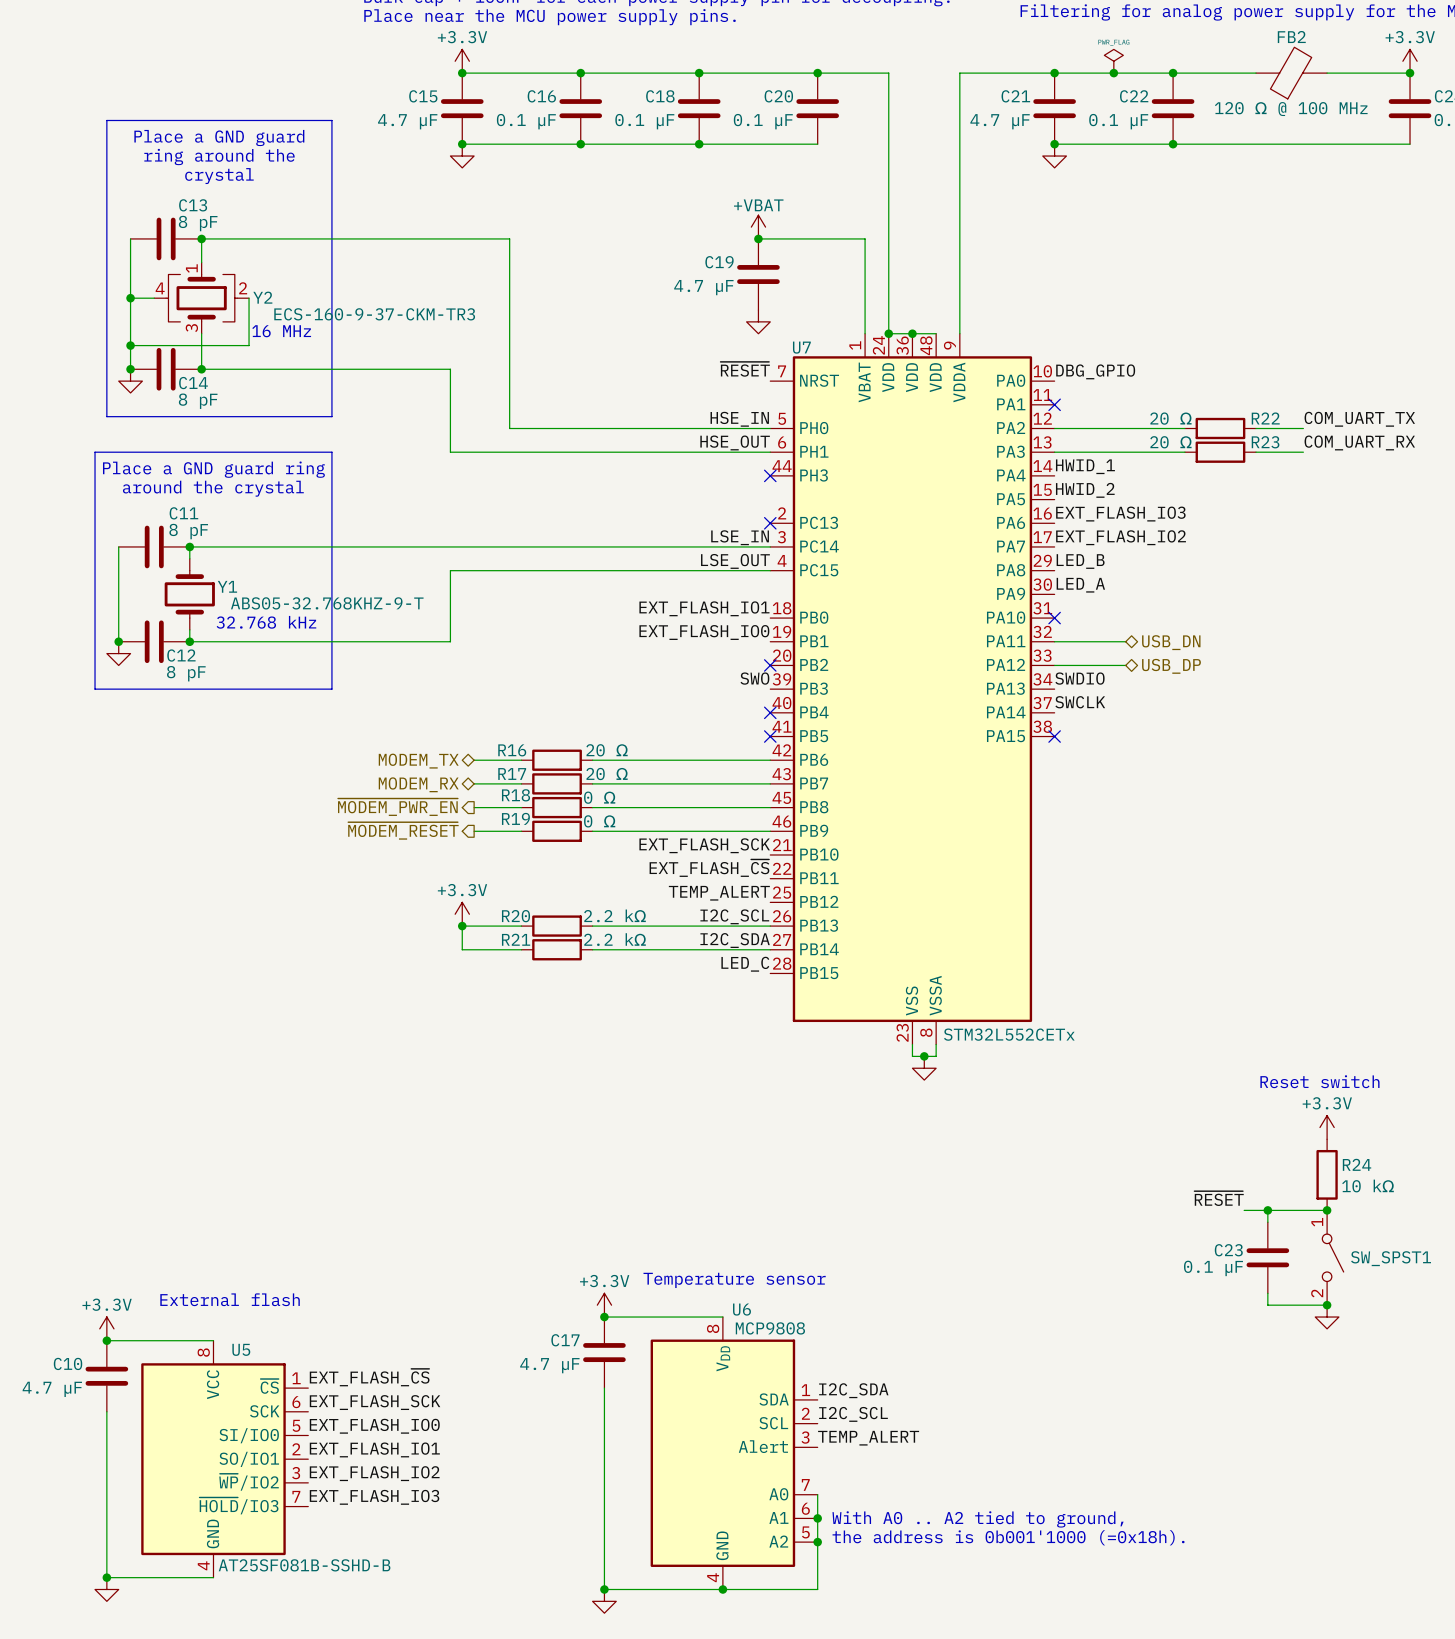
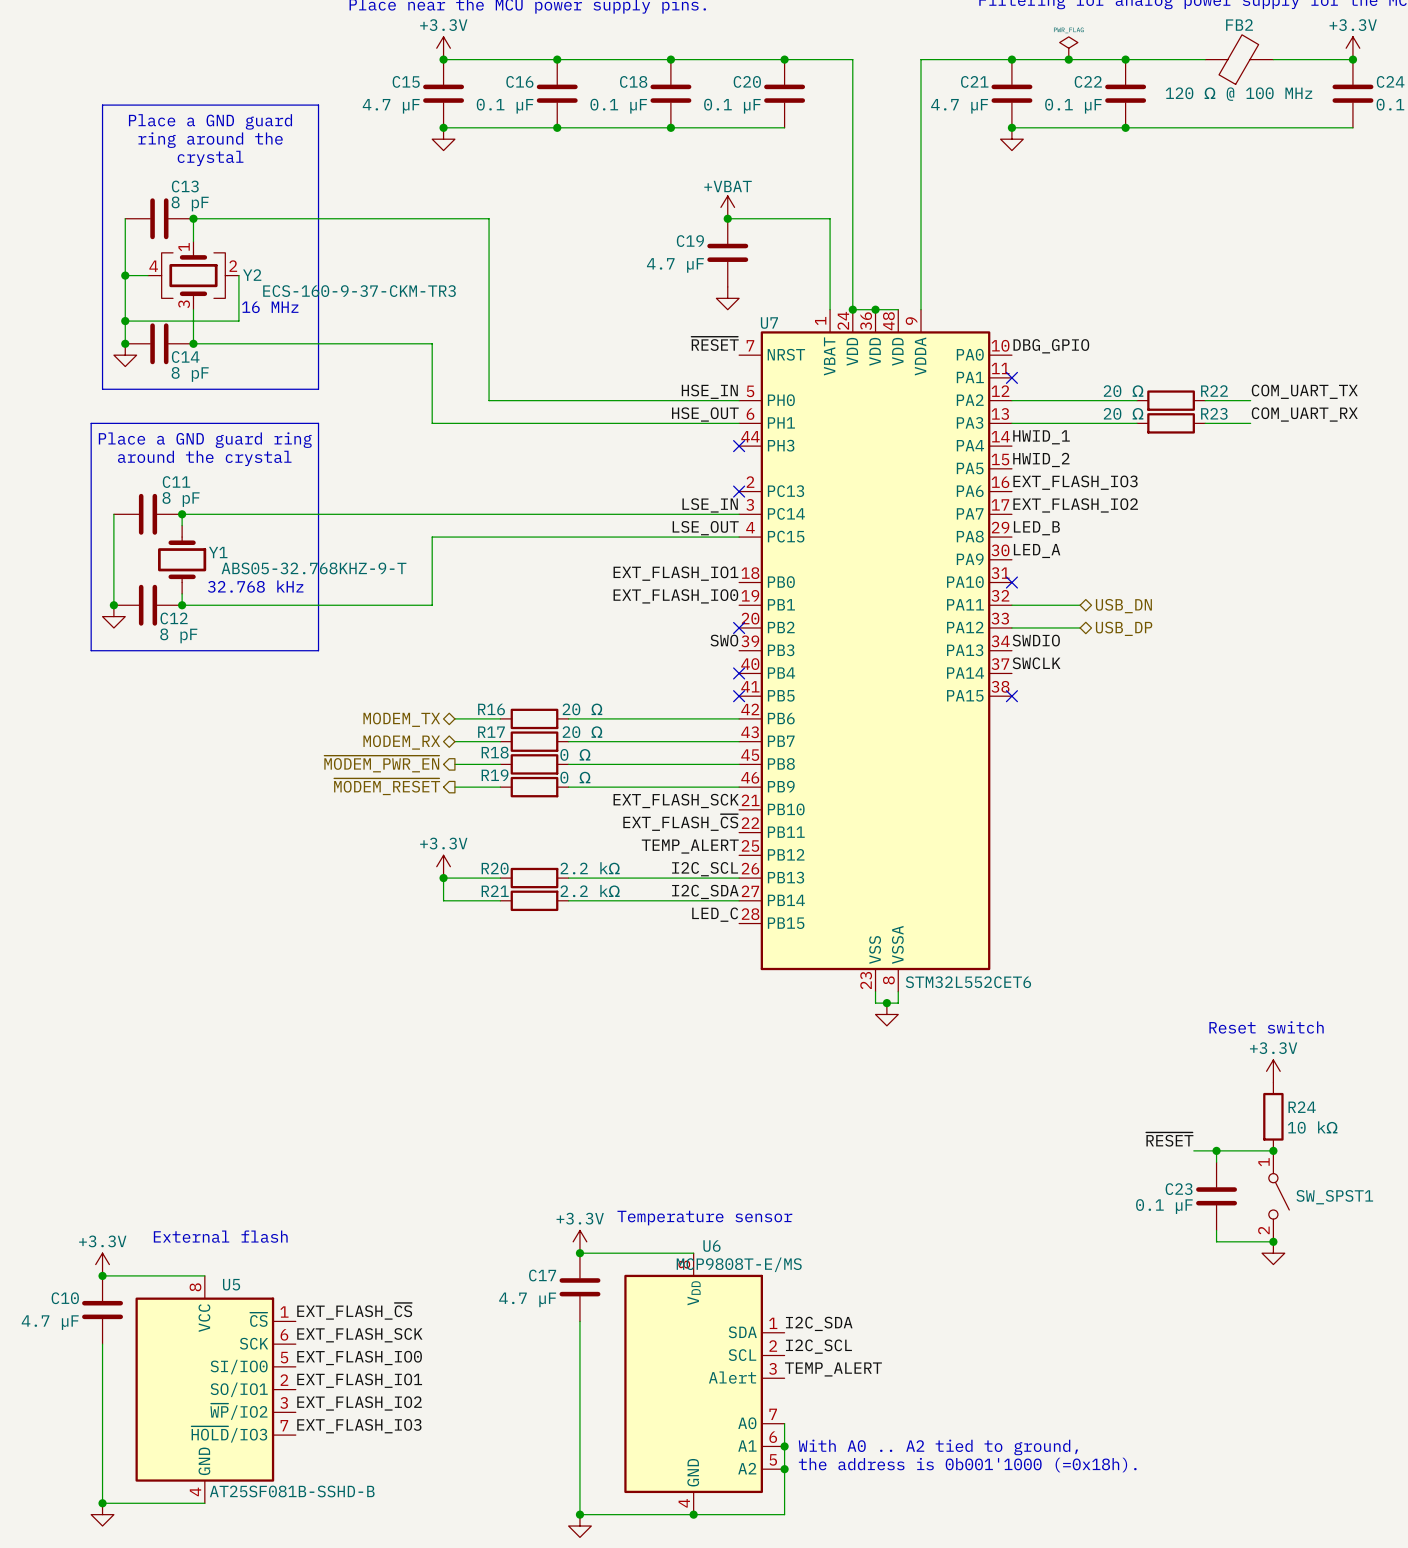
U7 value: STM32L552CETx (1009, 1034) -> STM32L552CET6 (968, 982)
U6 value: MCP9808 (770, 1328) -> MCP9808T-E/MS (739, 1264)

